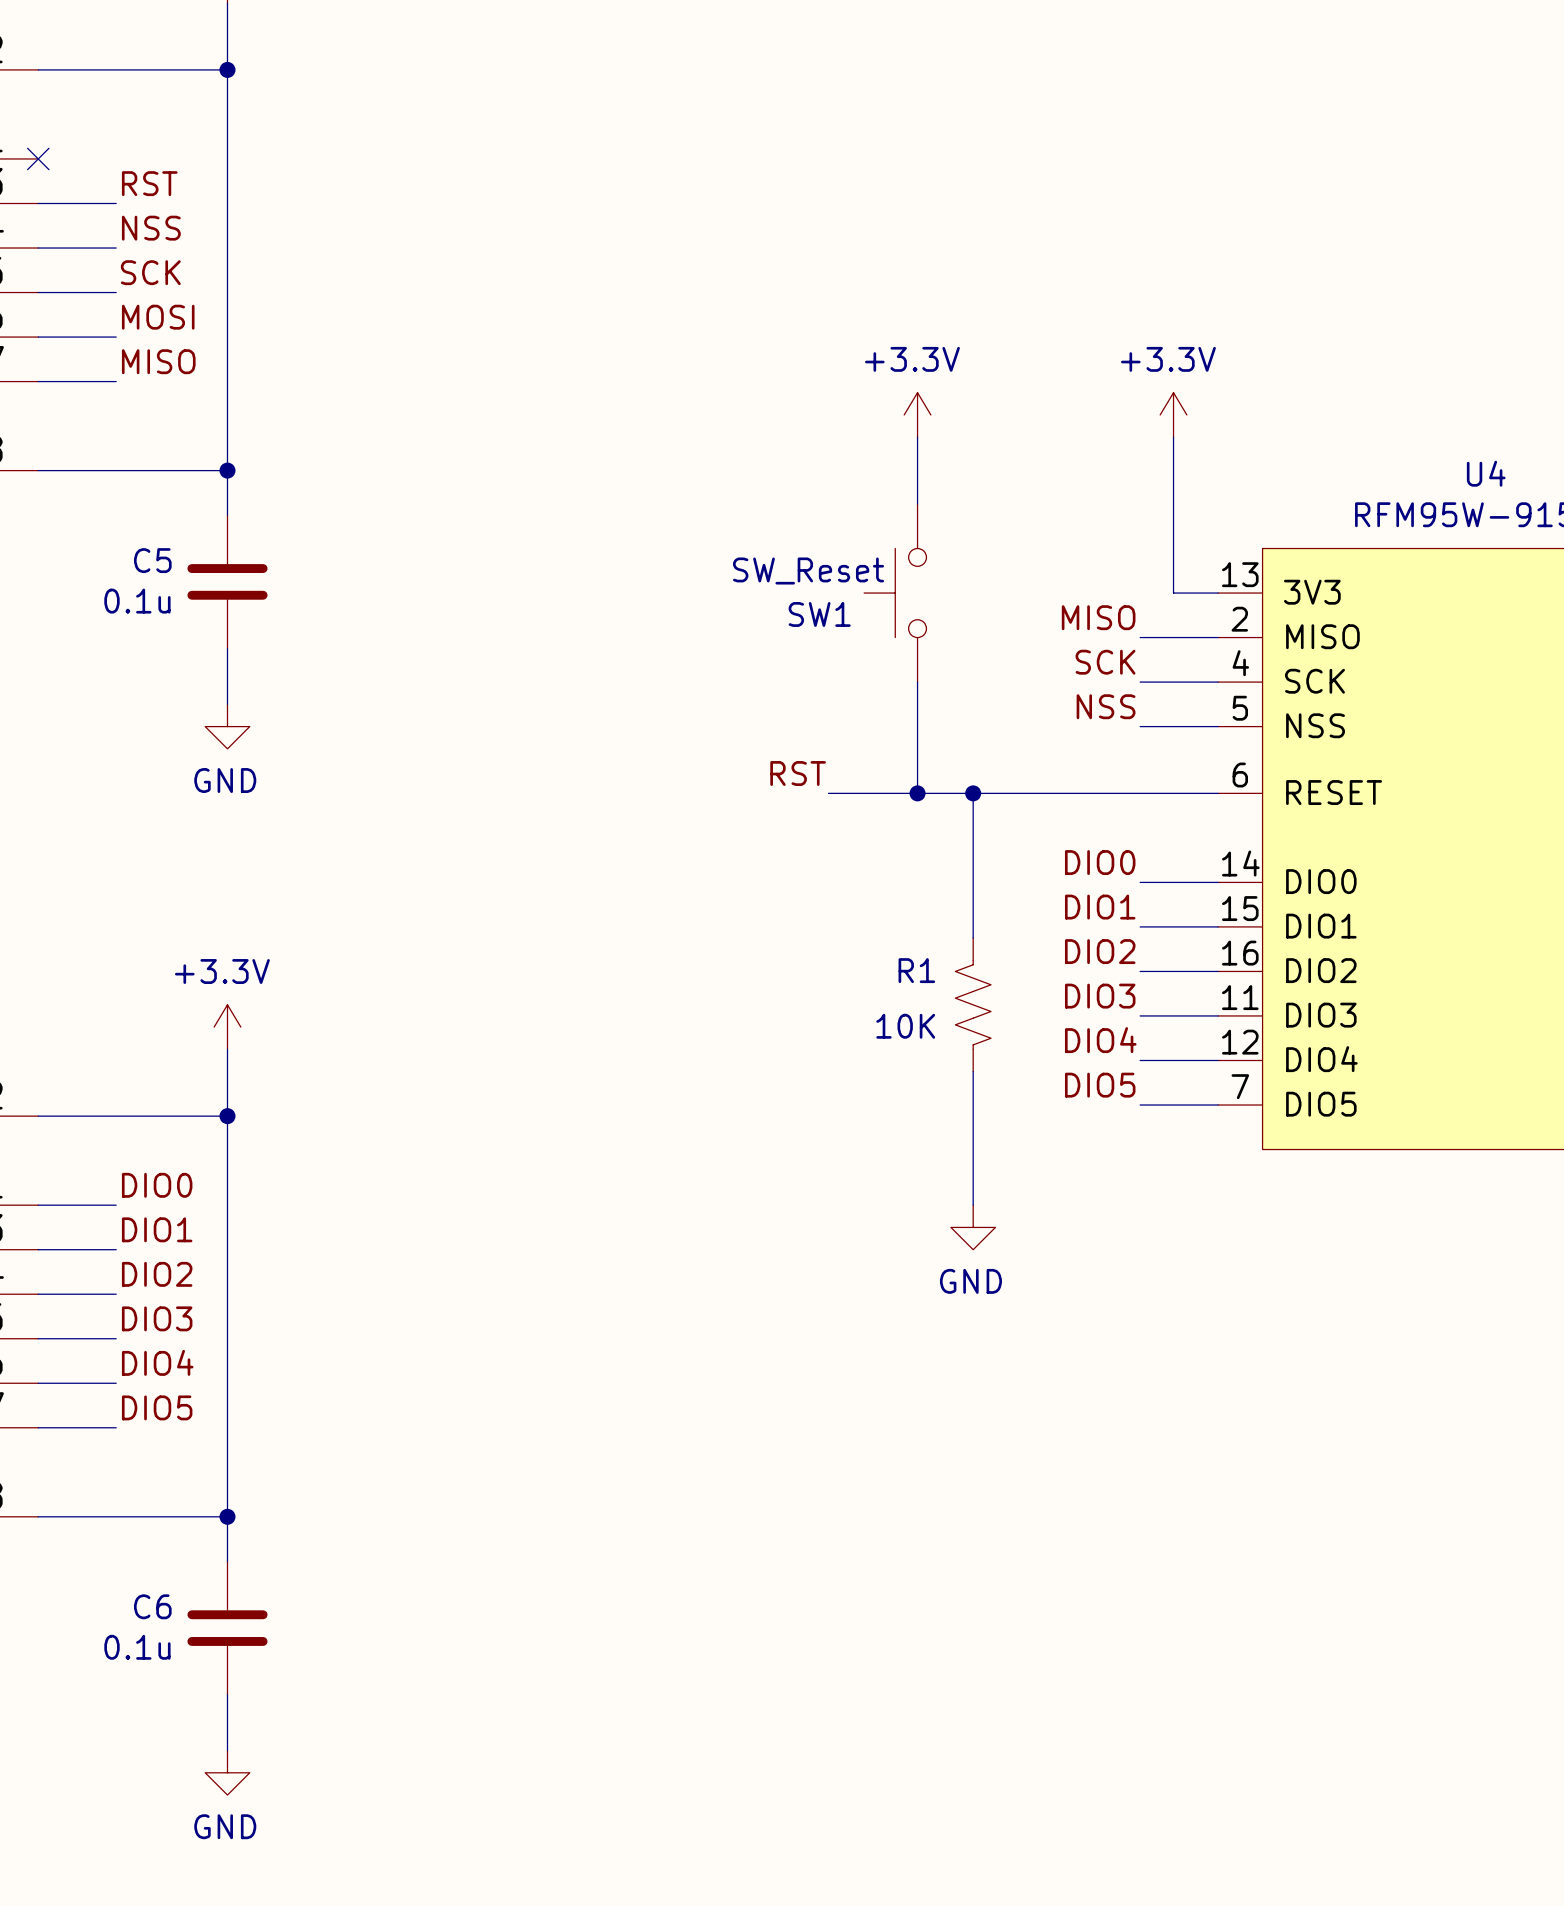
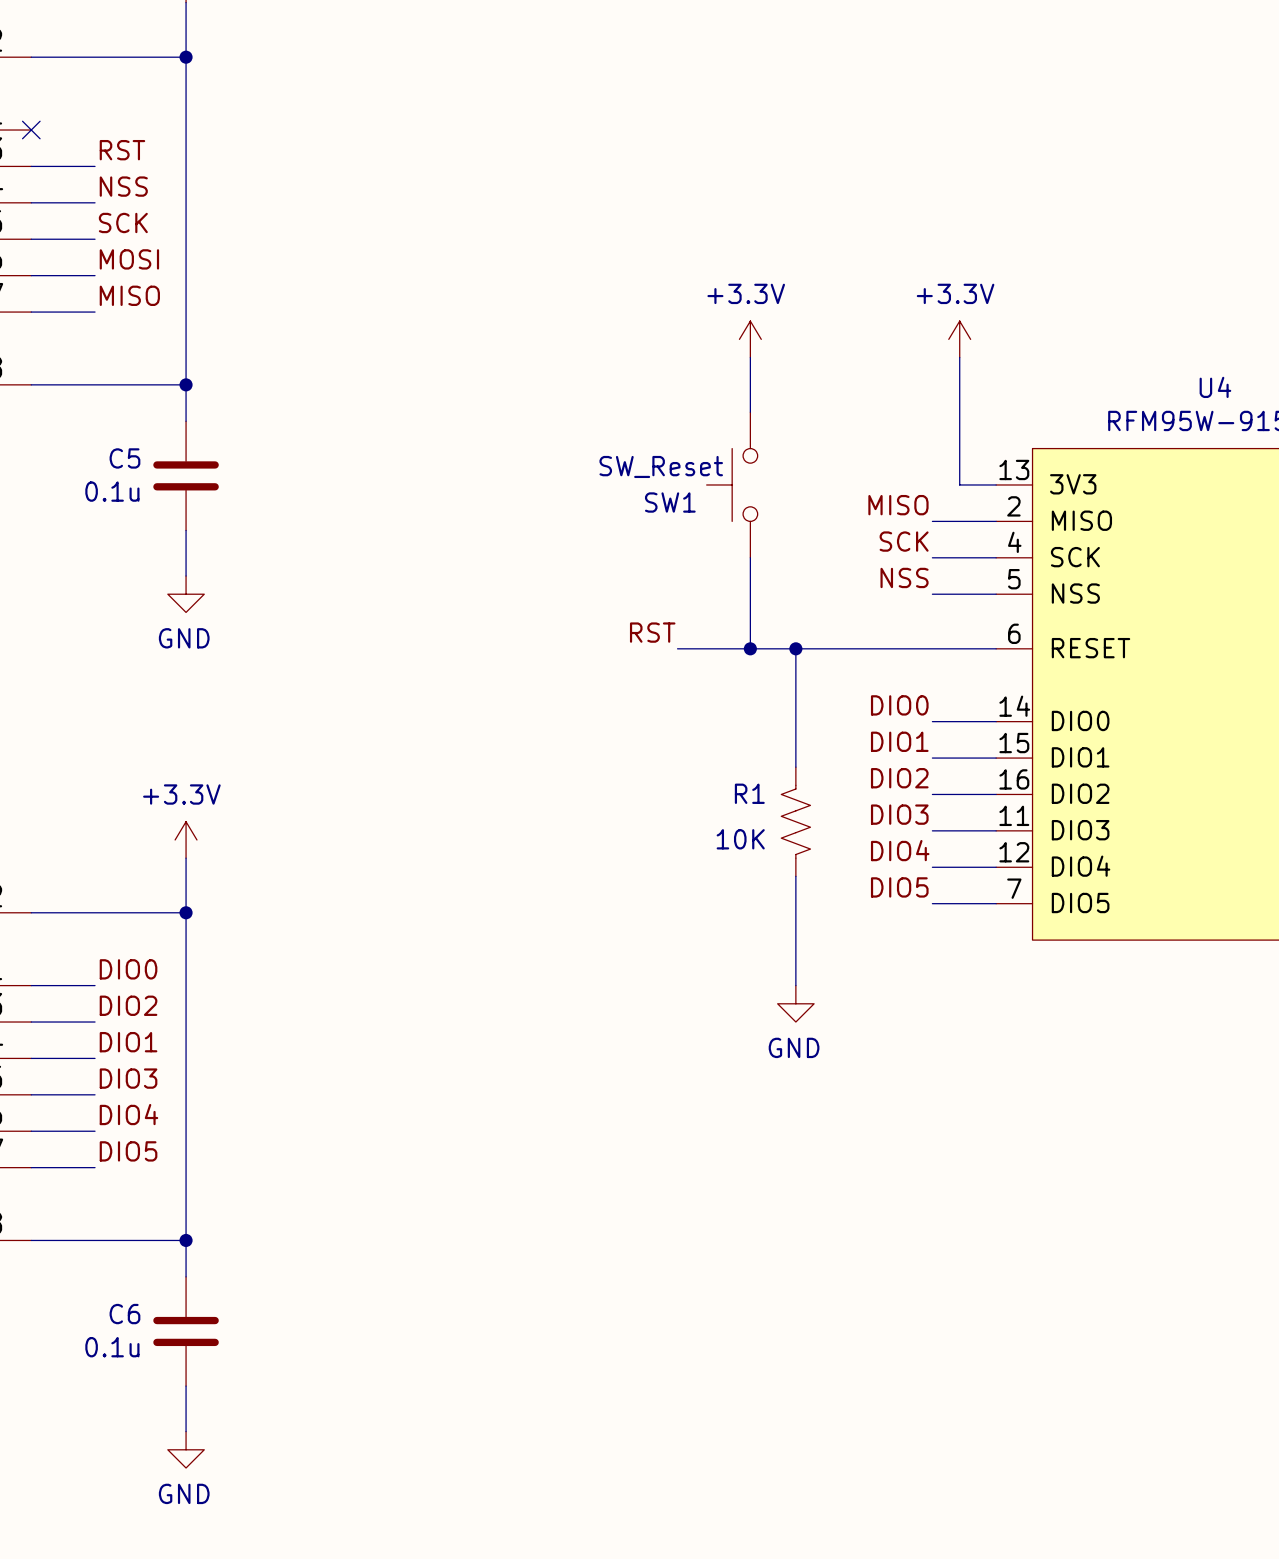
label: DIO1 (157, 1229) -> DIO2 (128, 1005)
label: DIO2 (157, 1274) -> DIO1 (128, 1042)

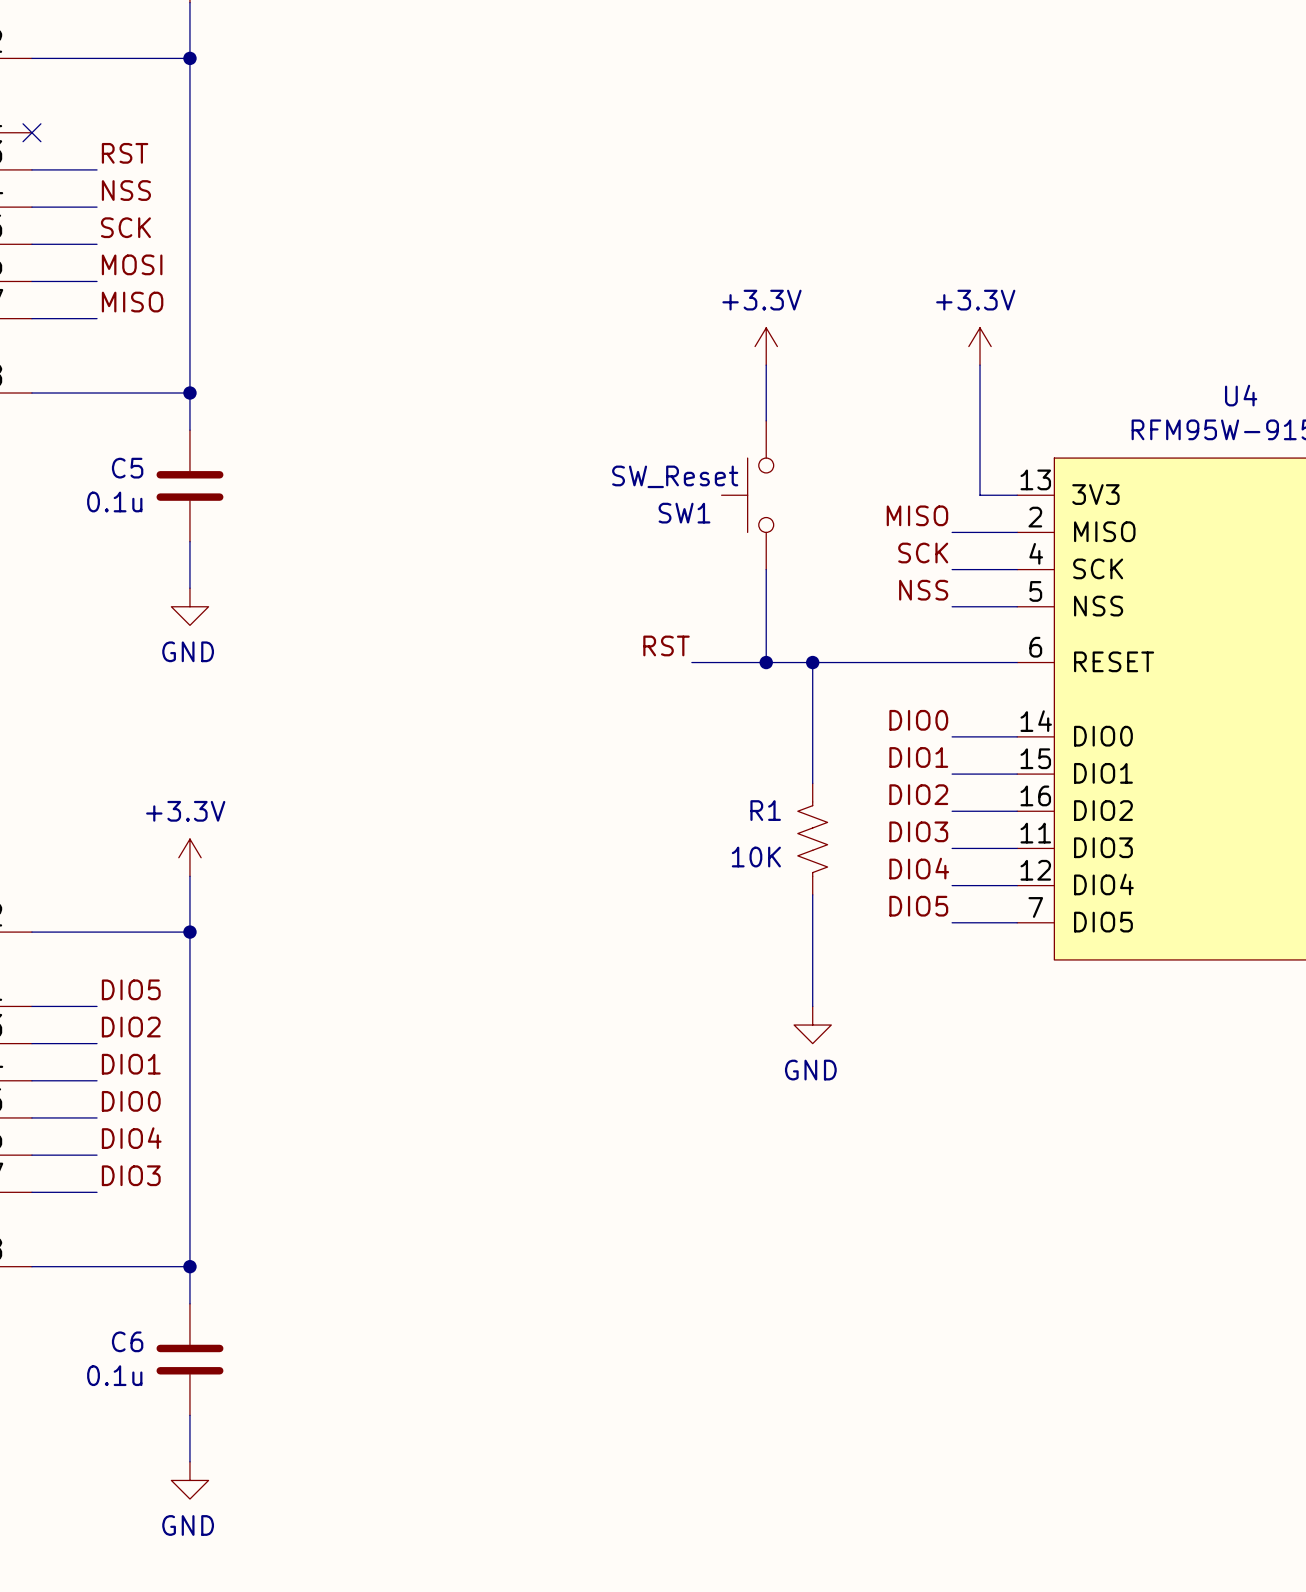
label: DIO0 (128, 969) -> DIO5 (131, 989)
label: DIO3 (128, 1078) -> DIO0 (131, 1101)
label: DIO5 (128, 1151) -> DIO3 (131, 1175)

